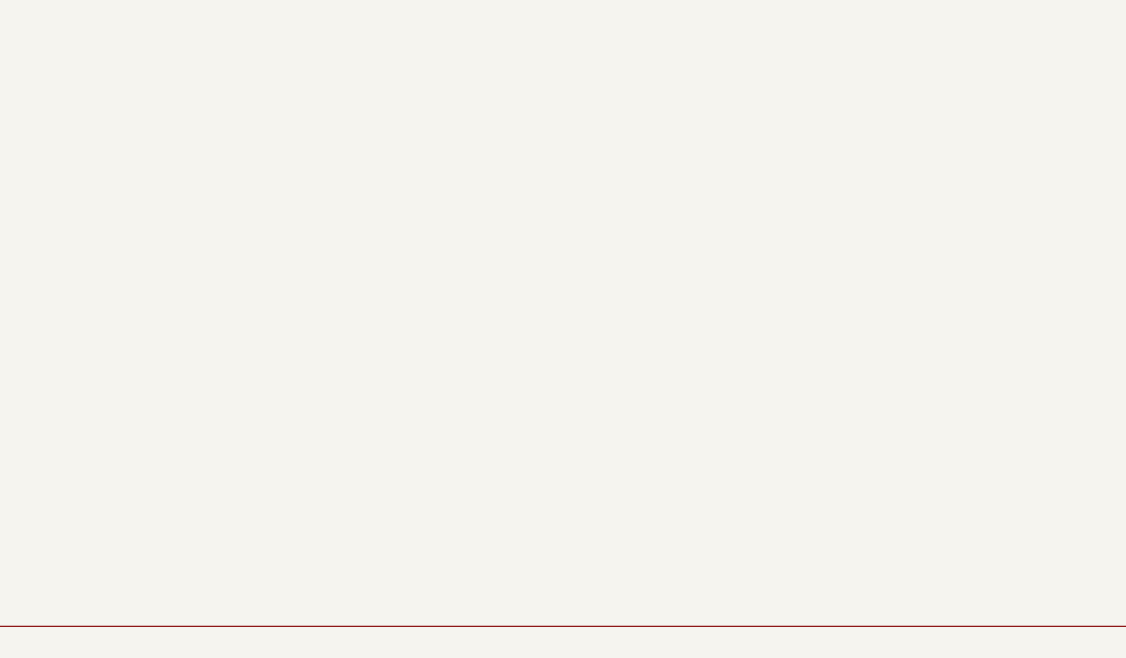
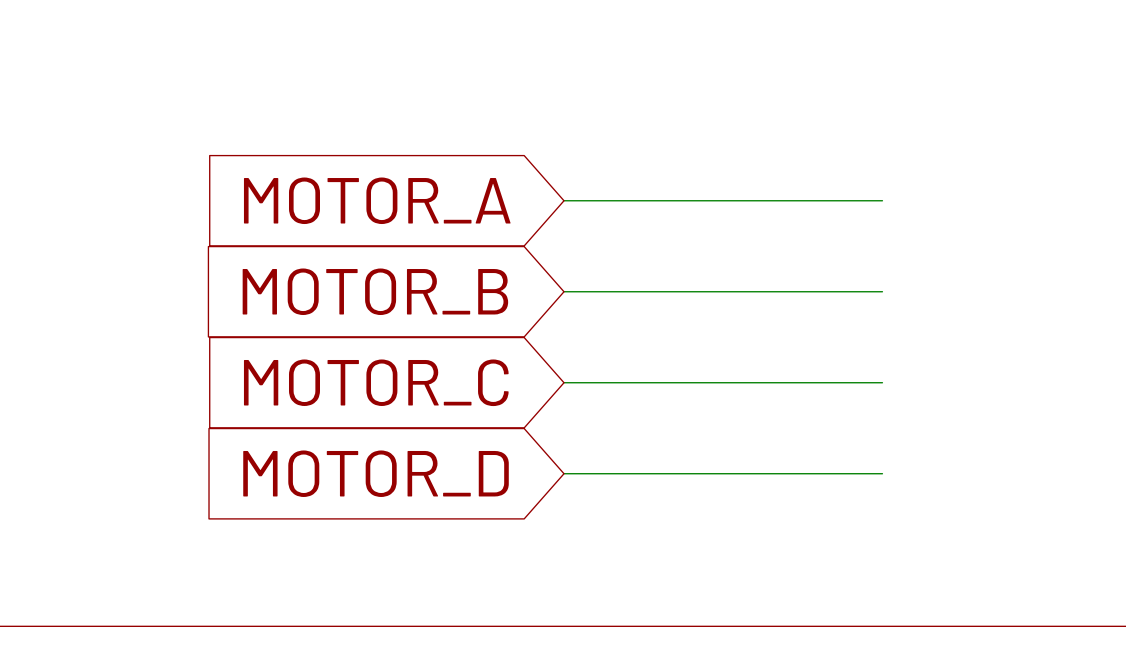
wire: none -> (564, 200) (882, 200)
global label: none -> MOTOR_A (377, 200)
wire: none -> (564, 291) (882, 291)
global label: none -> MOTOR_B (375, 291)
wire: none -> (564, 382) (882, 382)
global label: none -> MOTOR_C (376, 382)
wire: none -> (564, 473) (882, 473)
global label: none -> MOTOR_D (376, 473)

